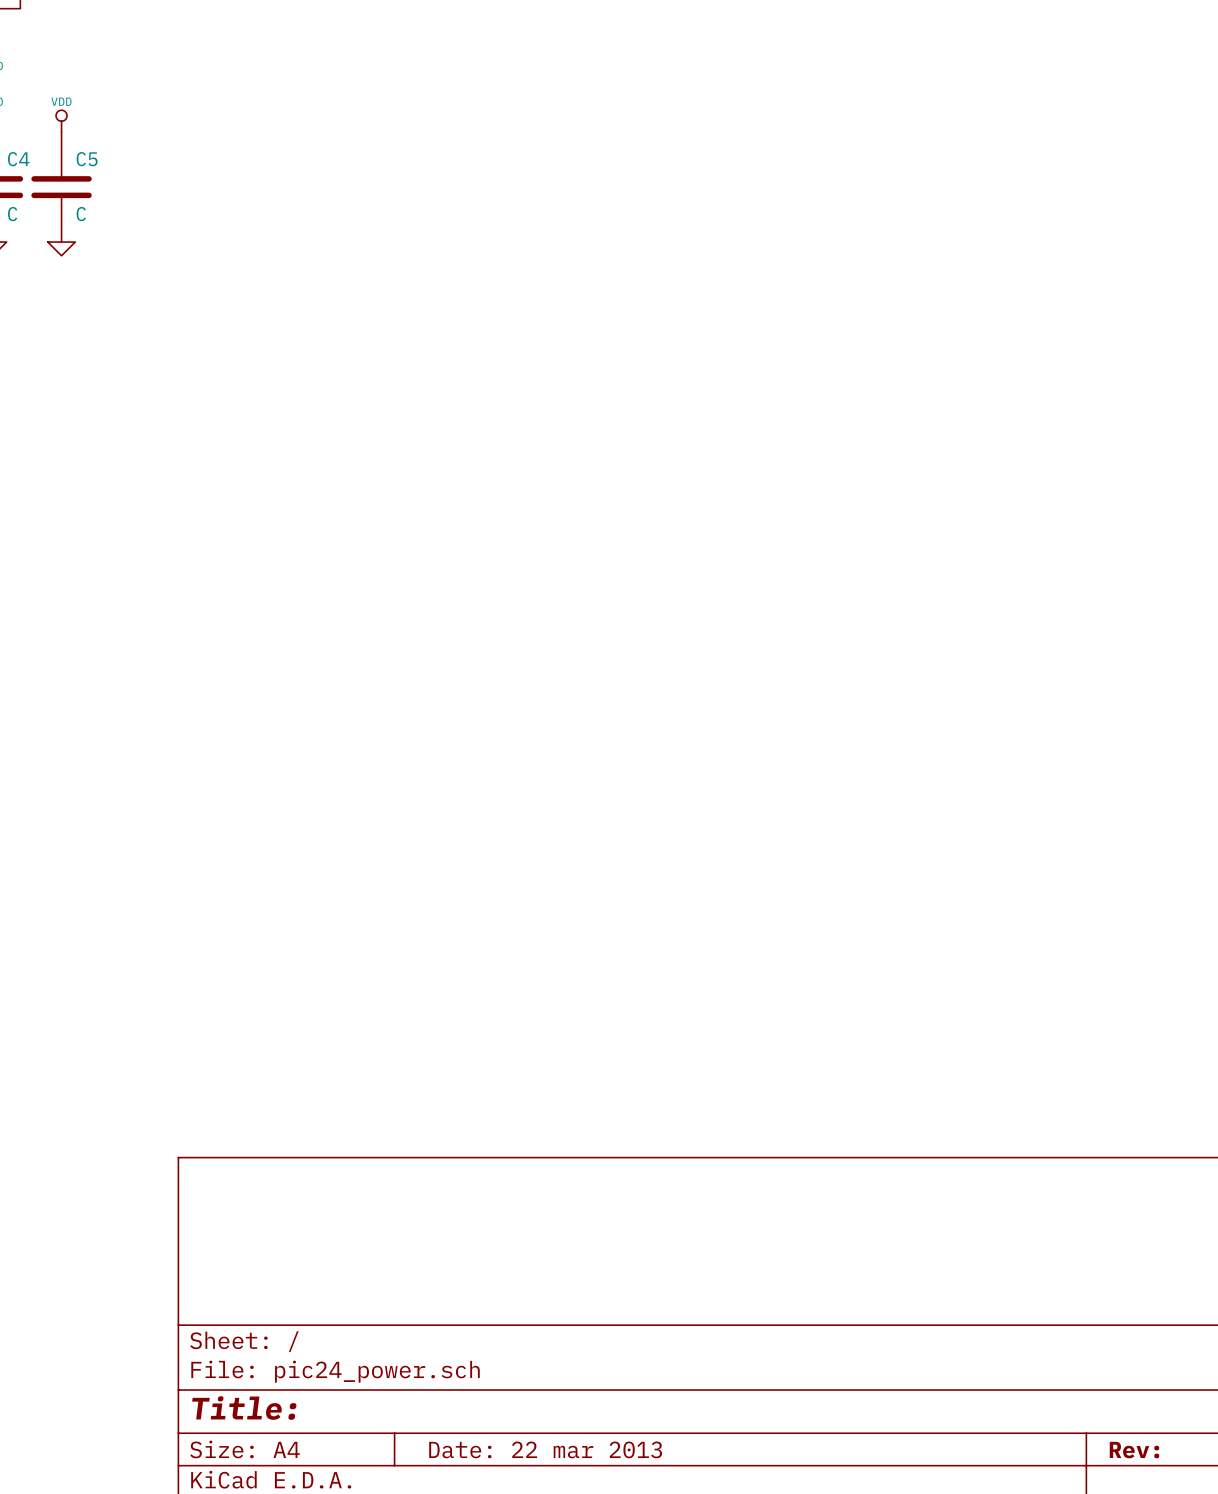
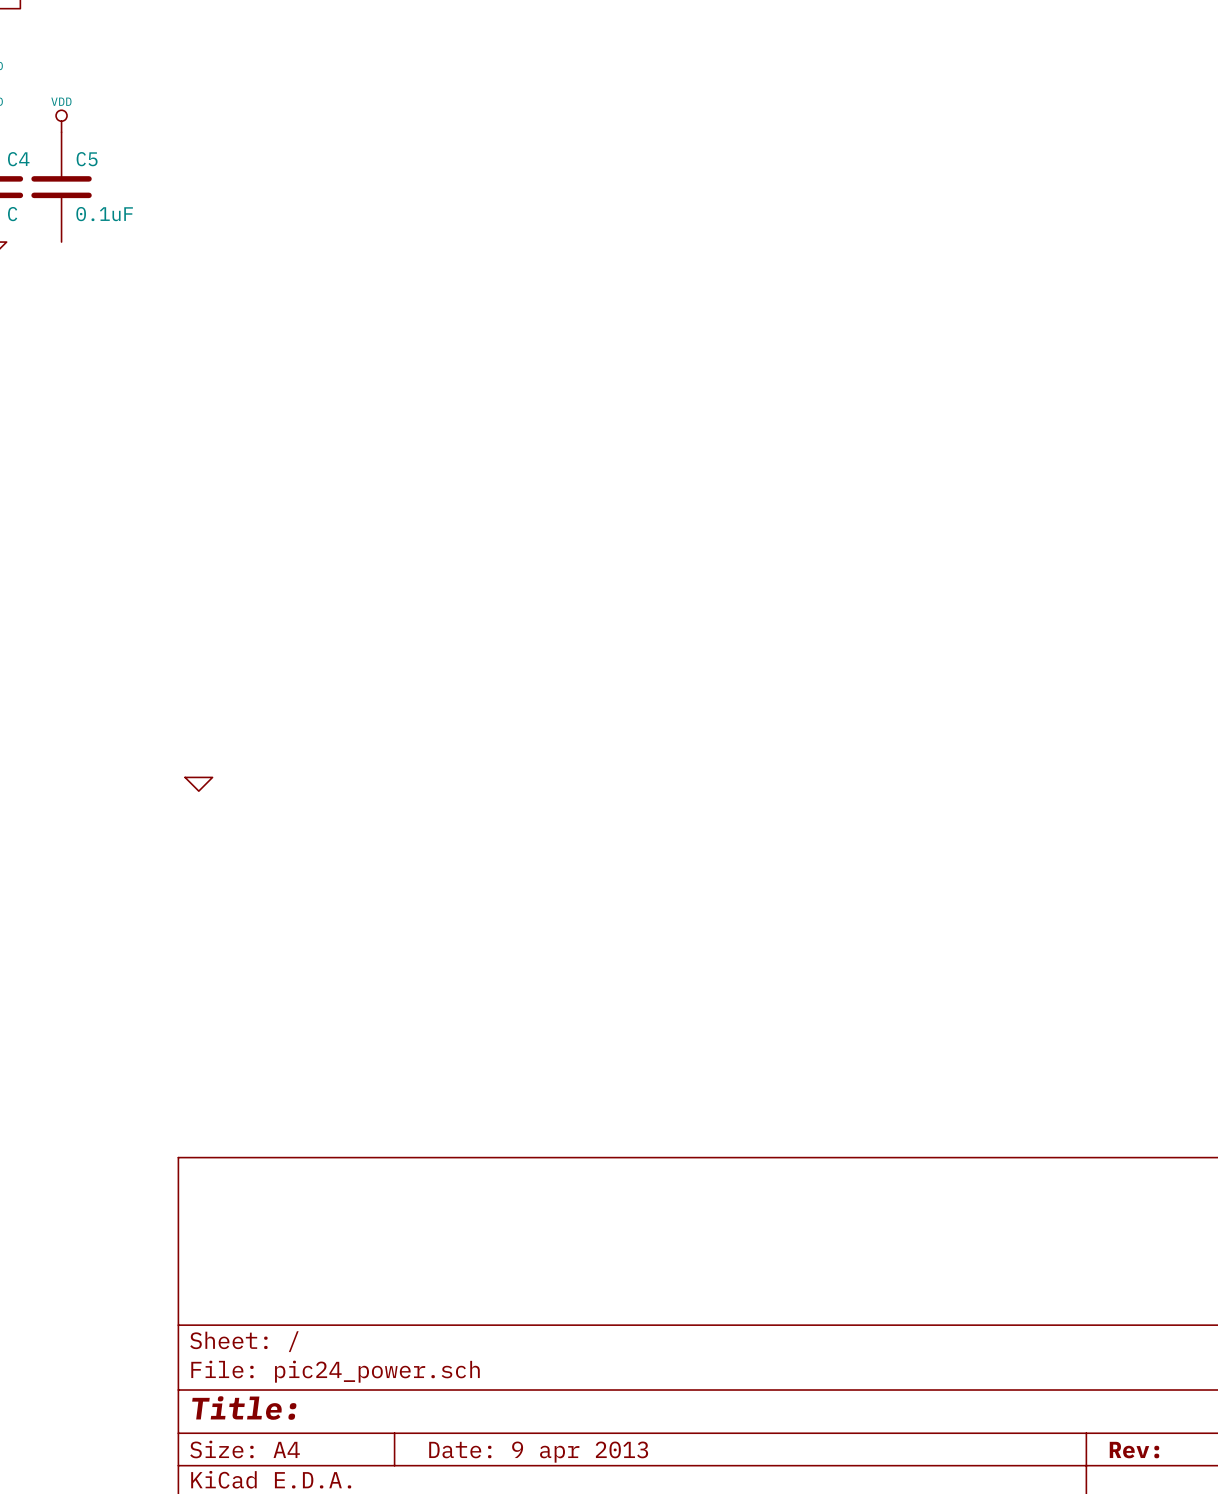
C5 value: C (81, 214) -> 0.1uF (104, 214)
power symbol: (61, 248) -> none
power symbol: none -> (198, 784)
title block: Date: 22 mar 2013 (545, 1449) -> Date: 9 apr 2013 (538, 1452)

